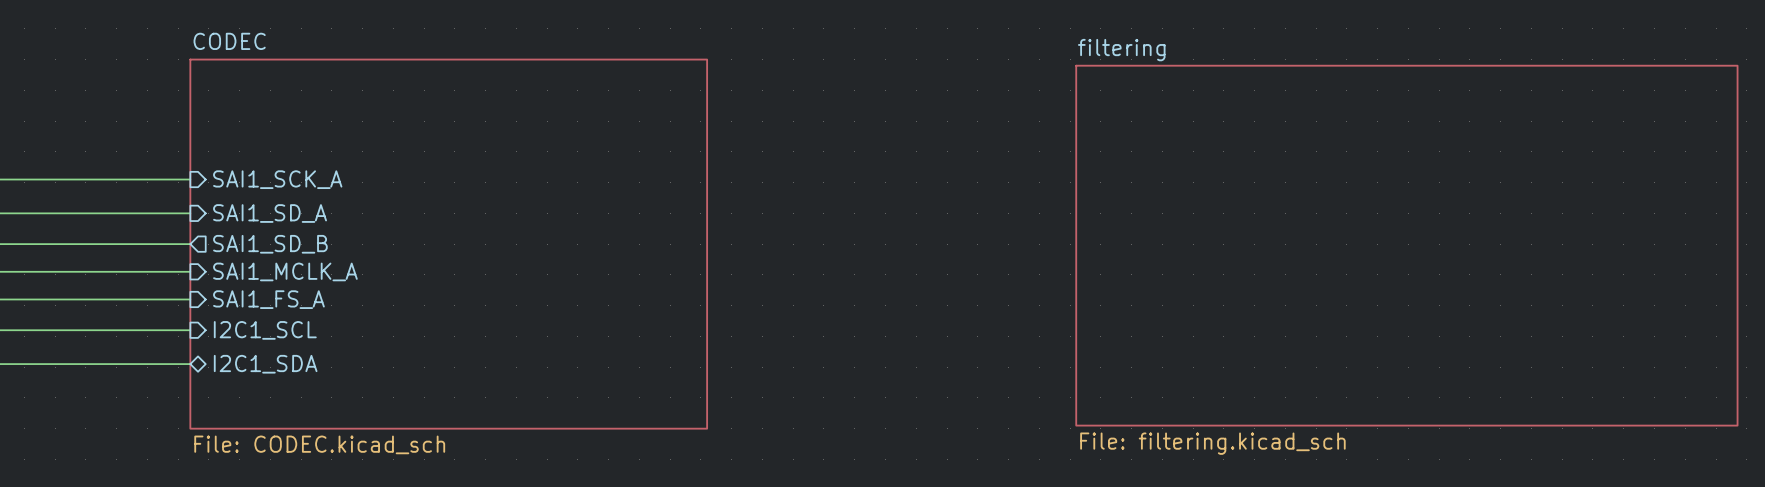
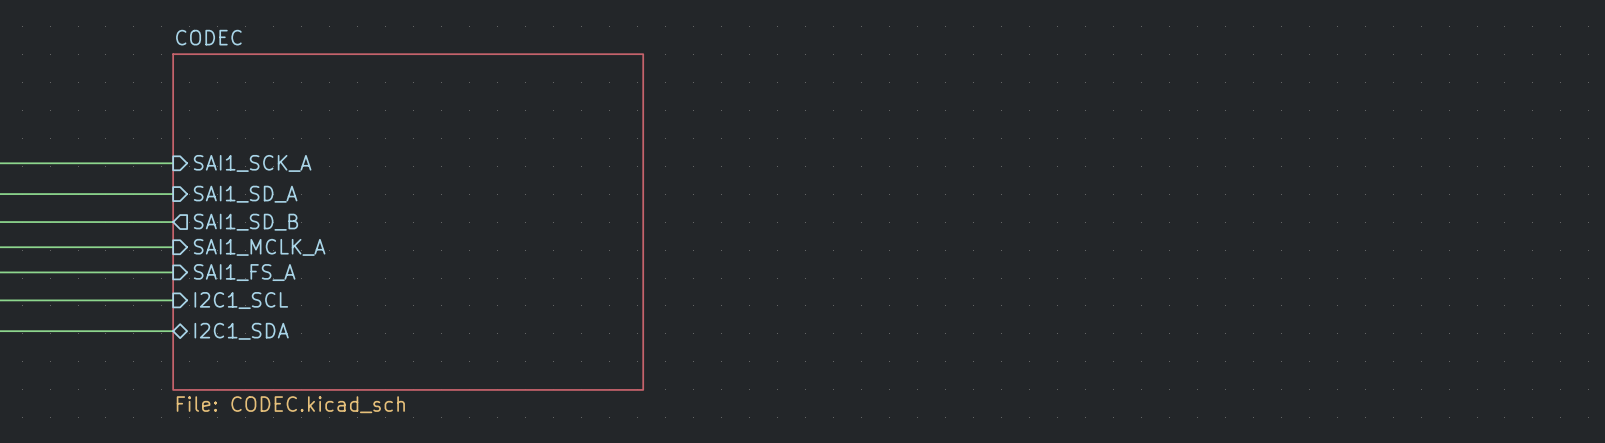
sheet filtering: File: filtering.kicad_sch (1406, 245) -> none

